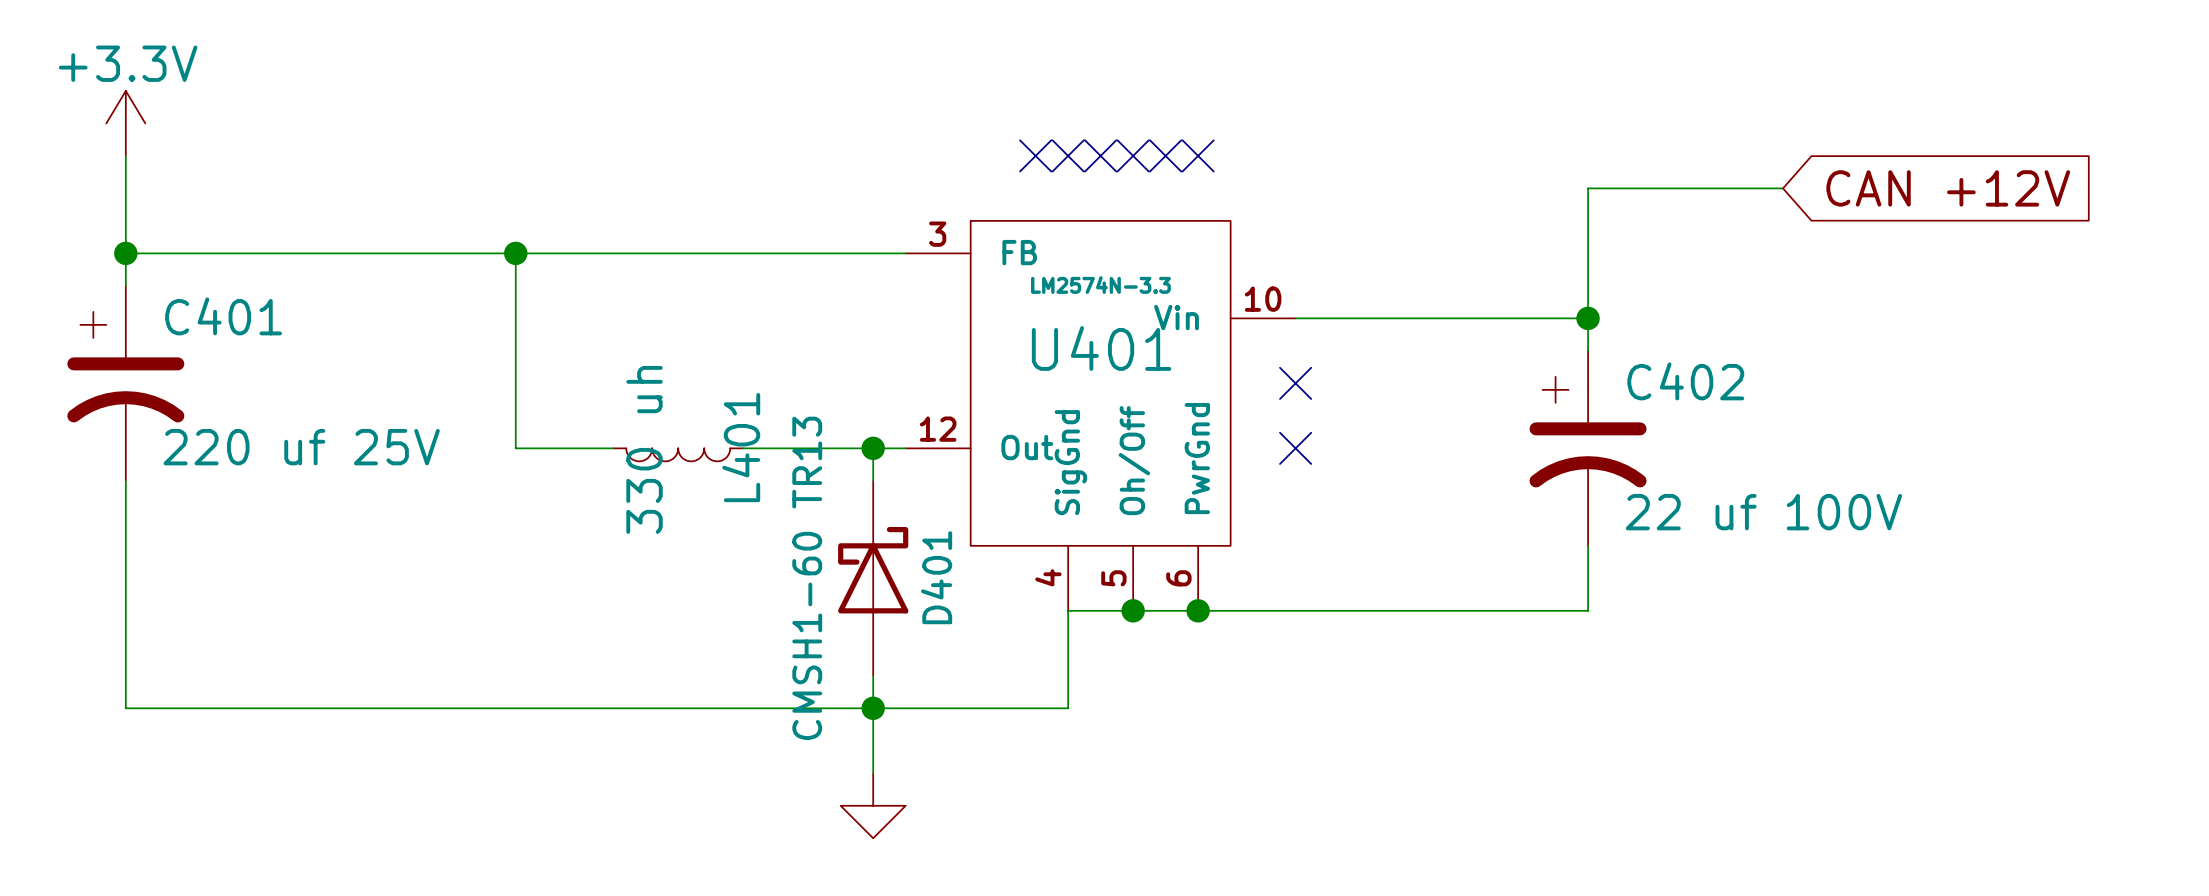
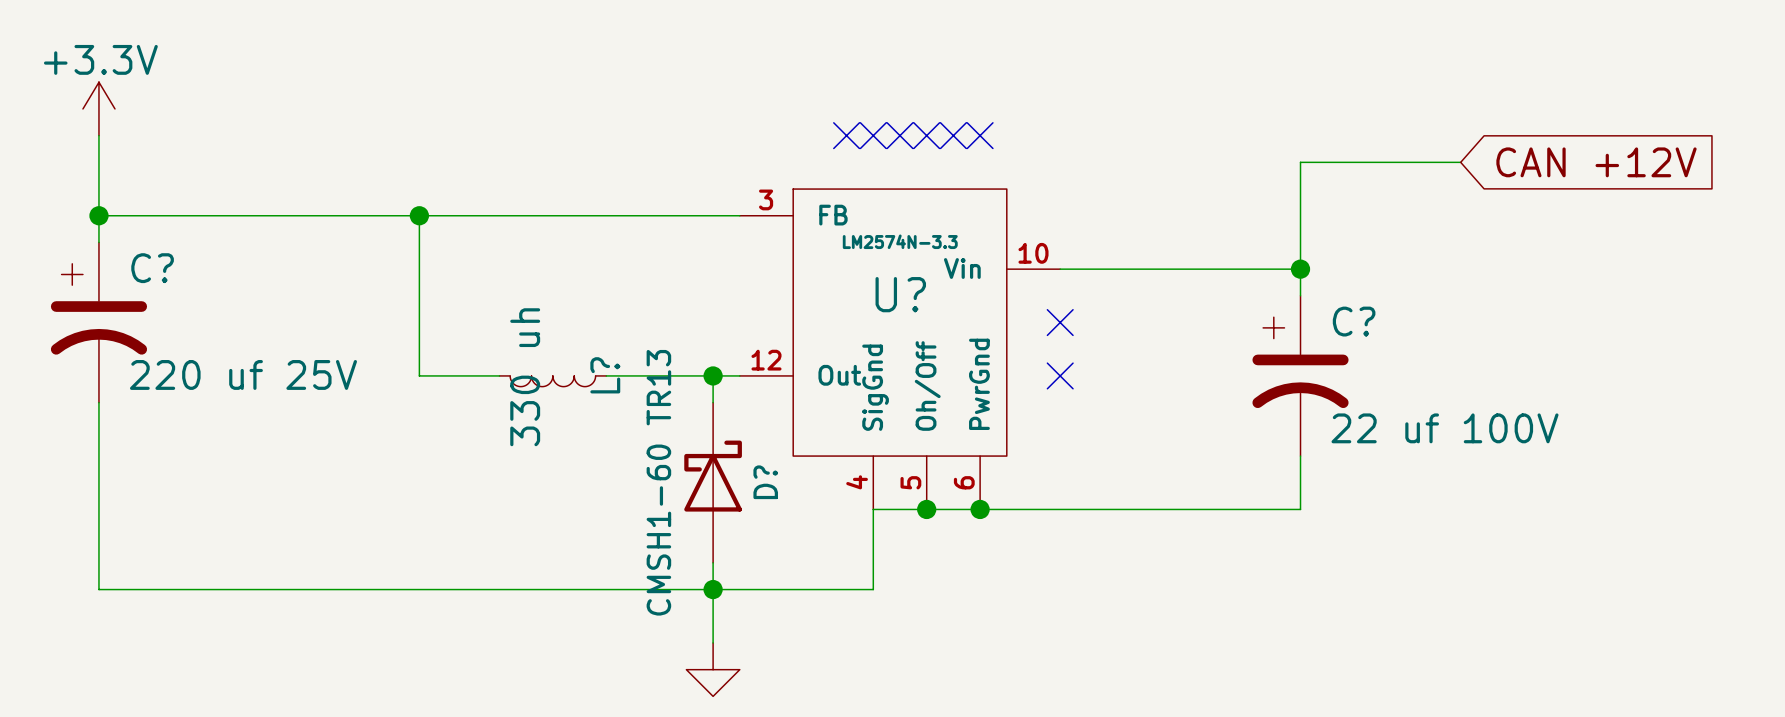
C401 name: C401 (223, 316) -> C? (152, 268)
U401 name: U401 (1101, 348) -> U? (900, 294)
C402 name: C402 (1685, 381) -> C? (1354, 321)
L401 name: L401 (741, 447) -> L? (605, 375)
D401 name: D401 (936, 577) -> D? (765, 482)

